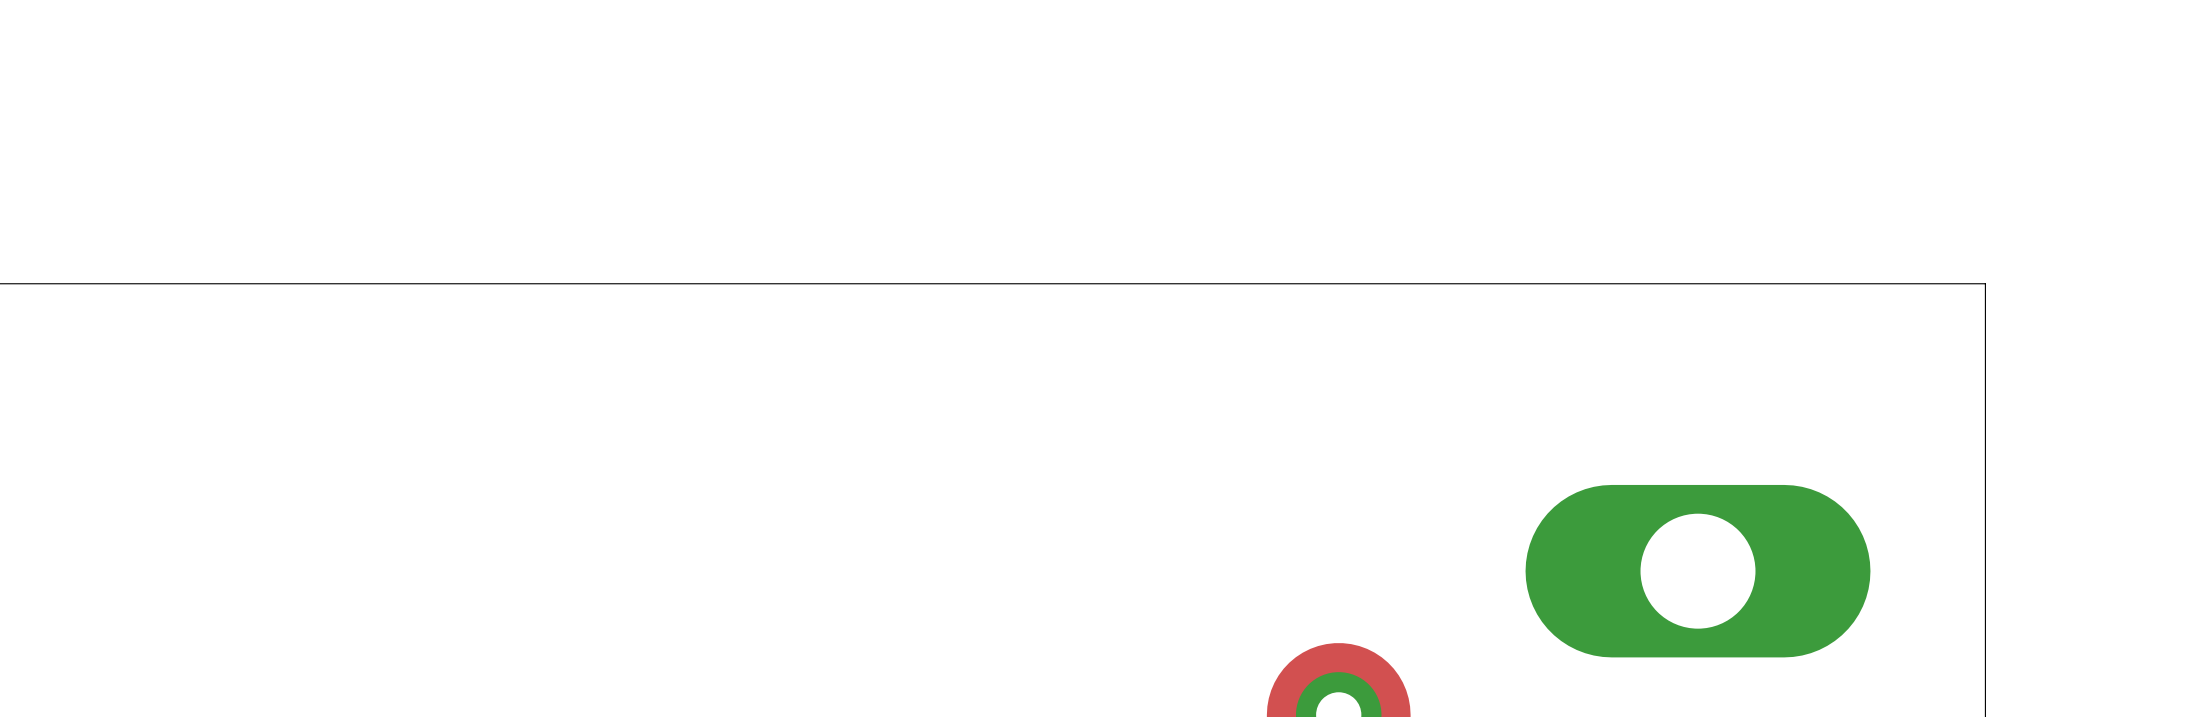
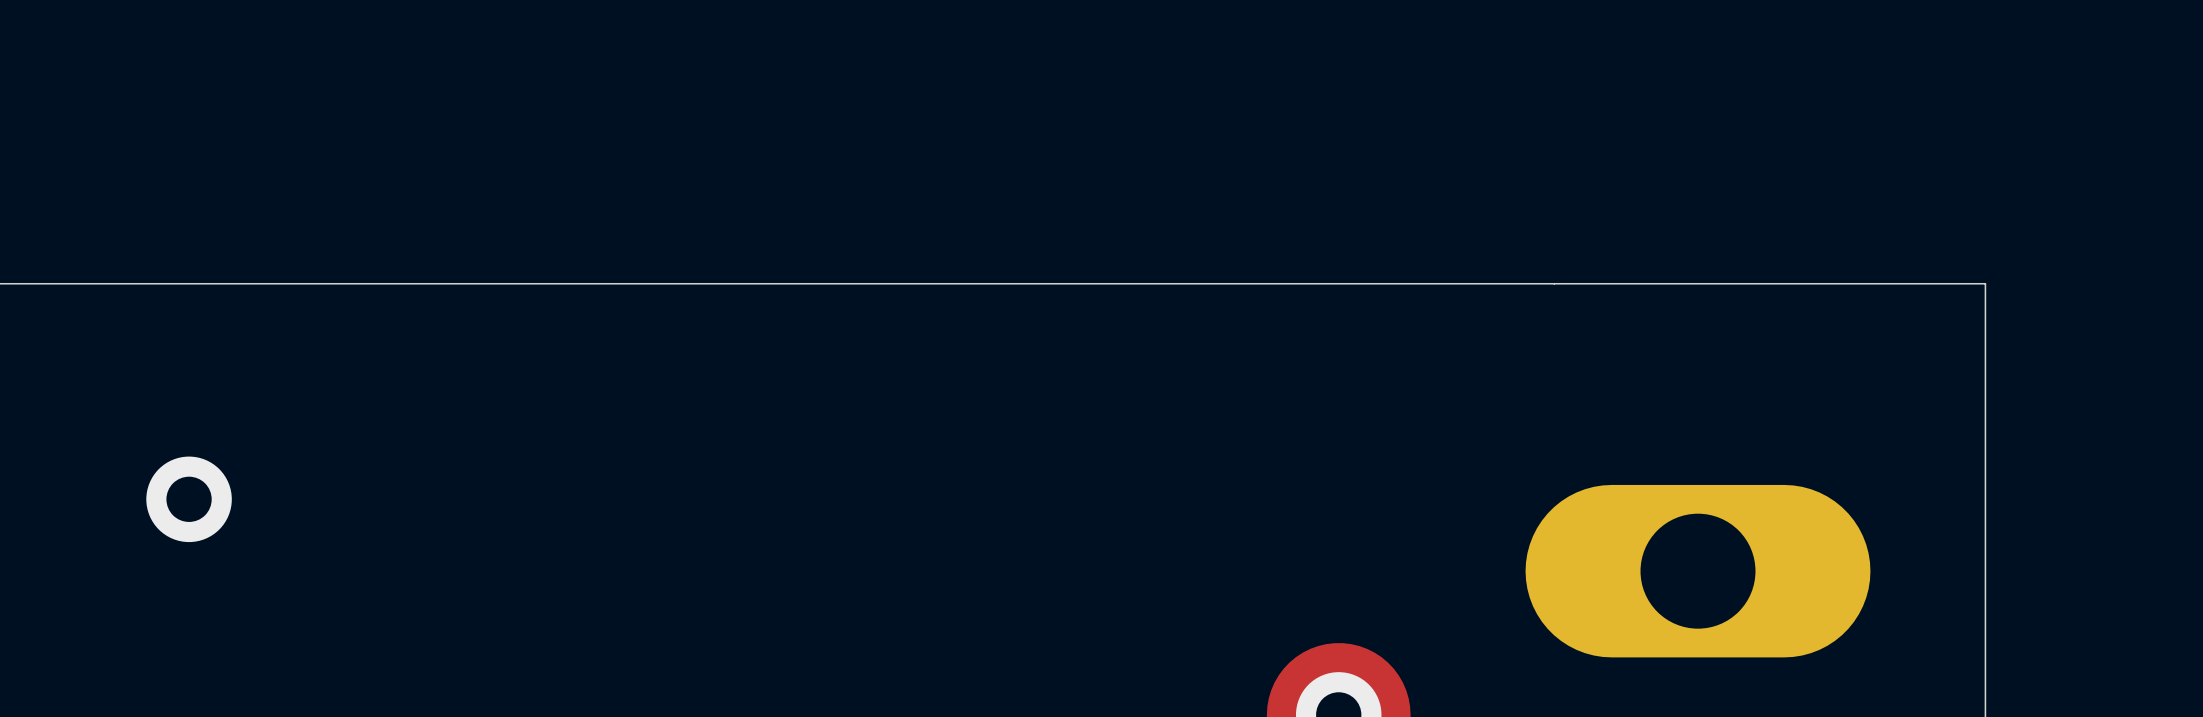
via: none -> (189, 499)

